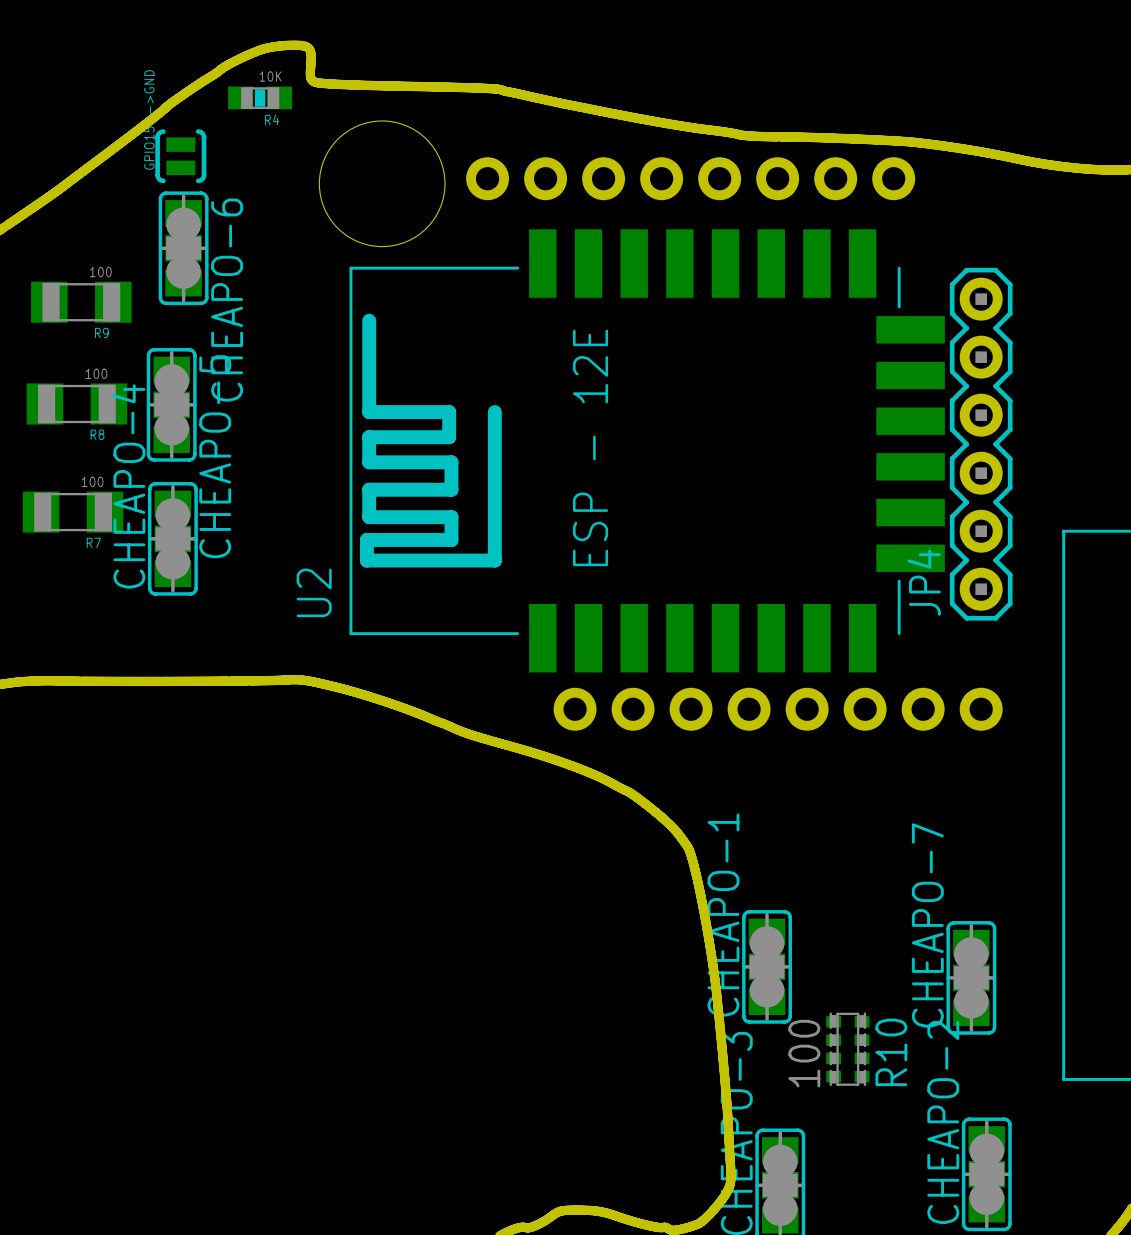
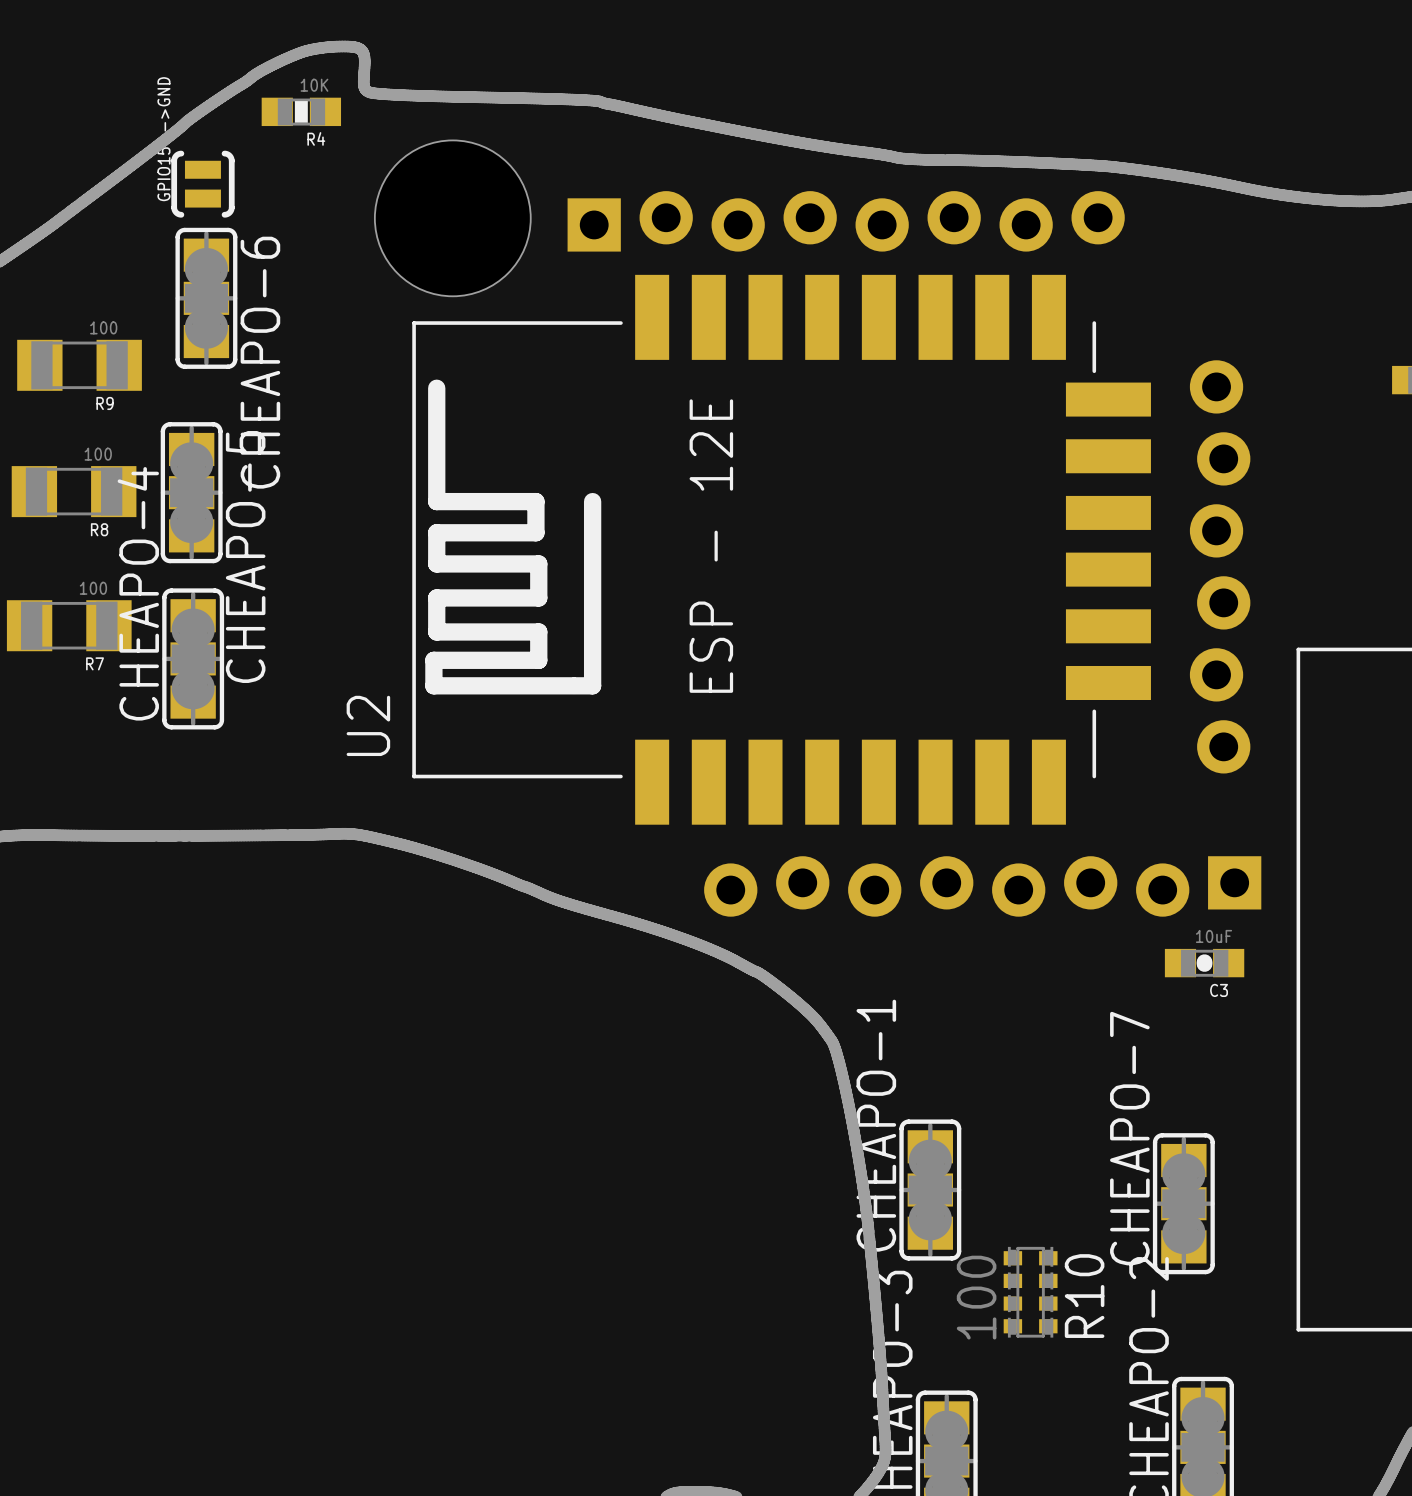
part footprint: [466, 157, 916, 201] -> [567, 191, 1125, 252]
JP4: (981, 444) -> none
part: none -> (1220, 566)
part: (778, 709) -> none
part: none -> (982, 886)
C3: none -> 10uF (1204, 963)

